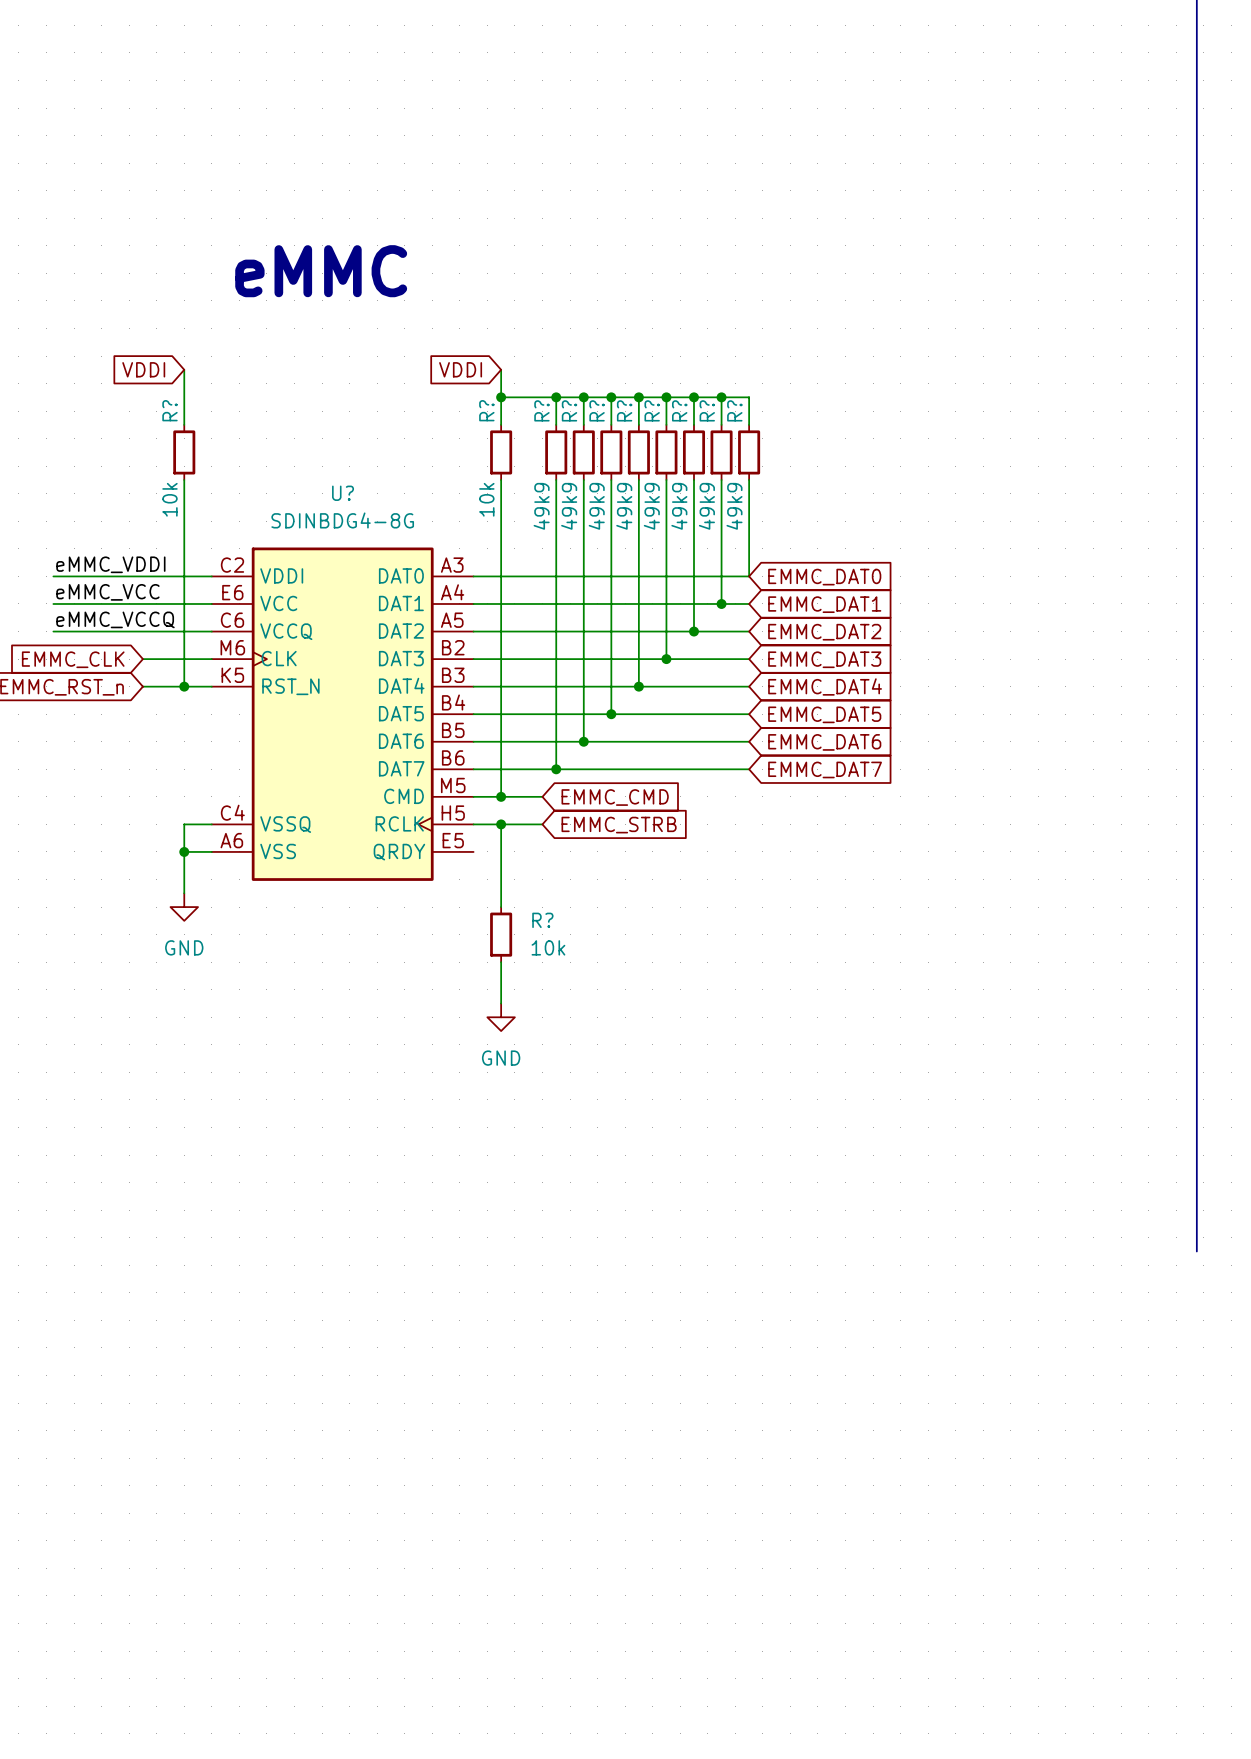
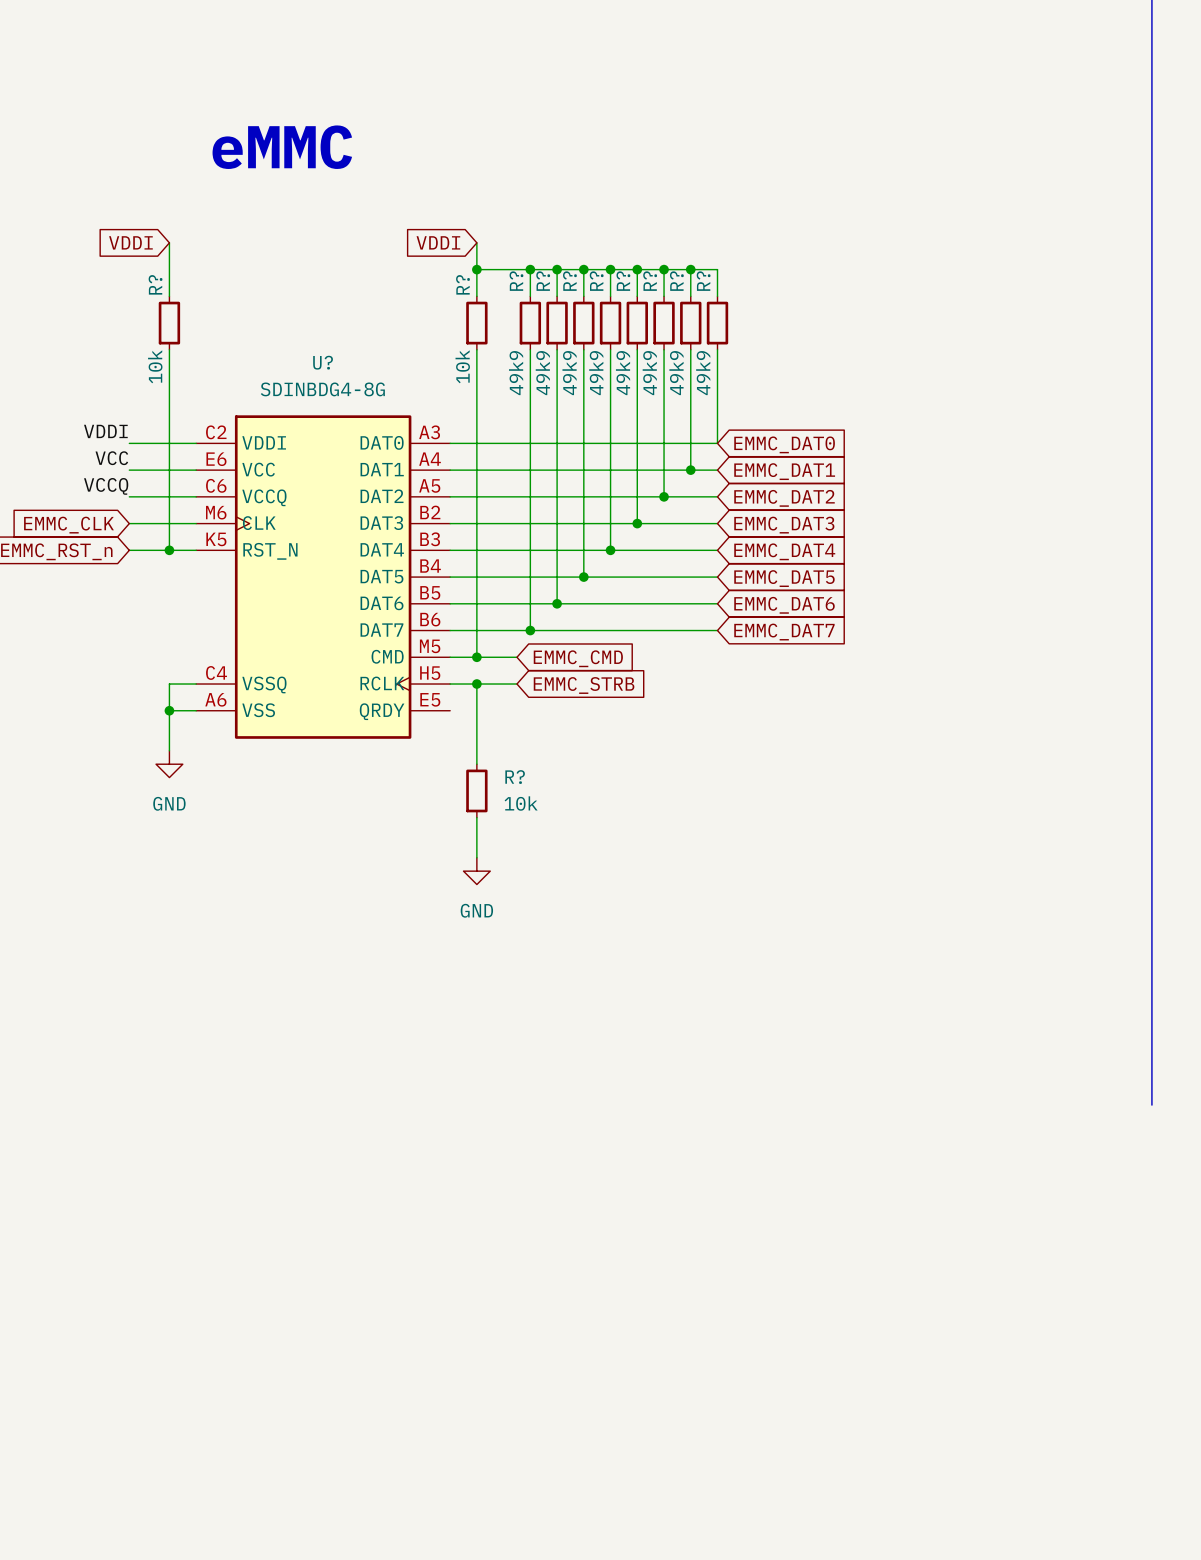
label: eMMC_VDDI (110, 564) -> VDDI (105, 431)
wire: (53, 576) (142, 576) -> none
label: none -> VCC (111, 458)
label: eMMC_VCC (107, 592) -> none
wire: (53, 603) (142, 603) -> none
label: eMMC_VCCQ (115, 619) -> VCCQ (106, 486)
wire: (53, 631) (142, 631) -> none
line: none -> (1151, 1098) (1151, 1105)

